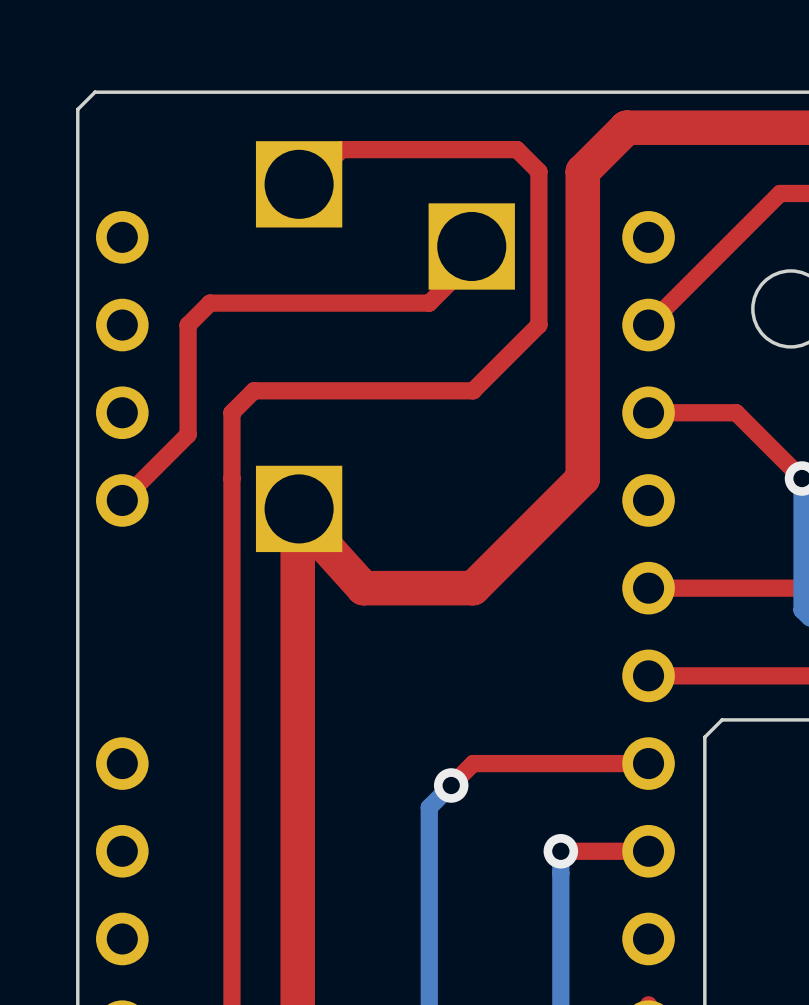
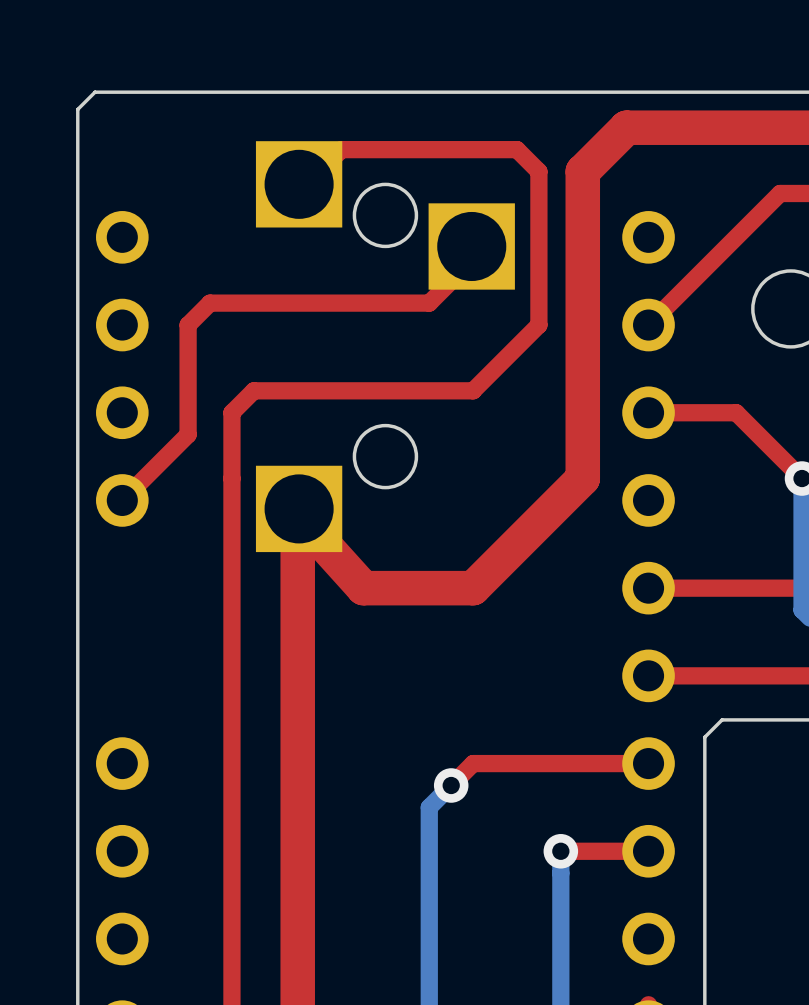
round board edge: none -> [352, 182, 419, 249]
round board edge: none -> [352, 423, 419, 490]

